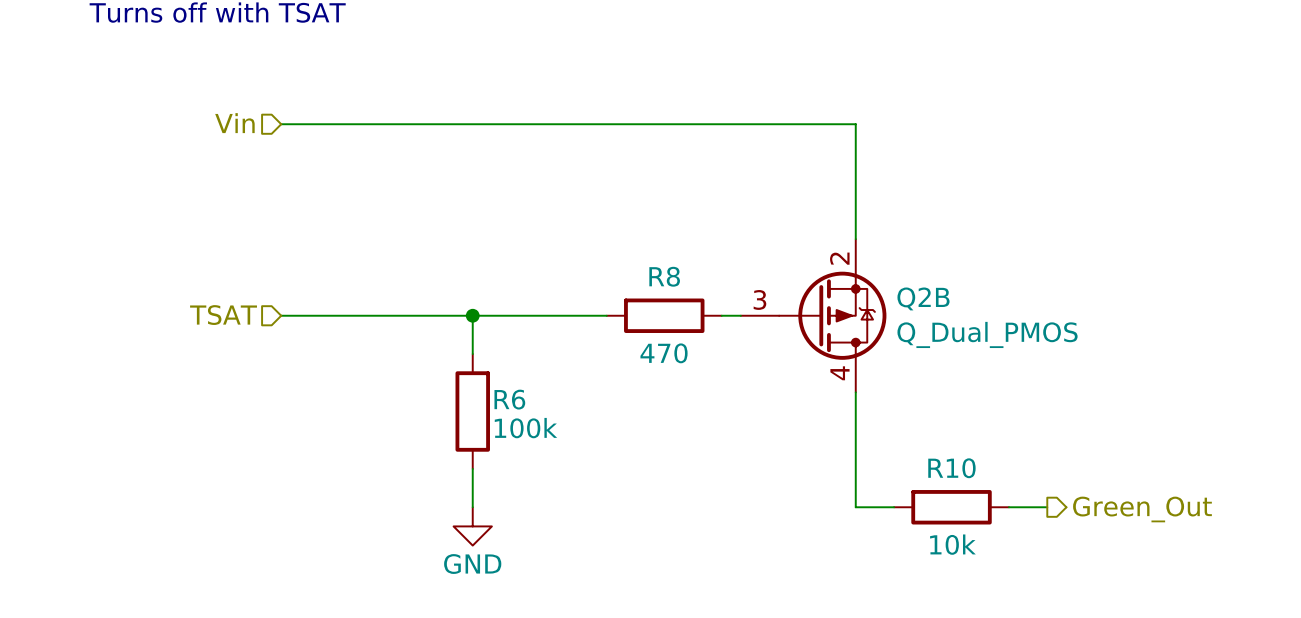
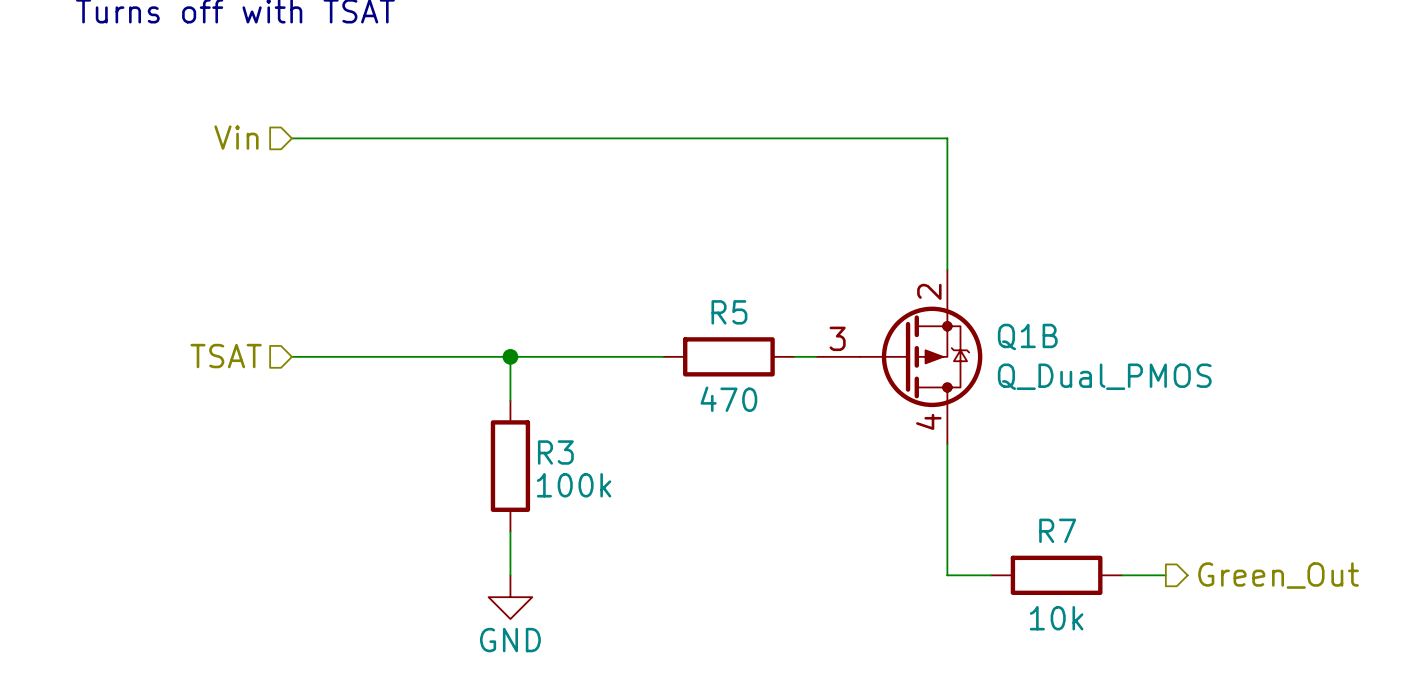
R8 name: R8 (664, 276) -> R5 (729, 312)
Q2B name: Q2B (923, 298) -> Q1B (1027, 336)
R6 name: R6 (509, 399) -> R3 (555, 452)
R10 name: R10 (951, 468) -> R7 (1057, 530)

